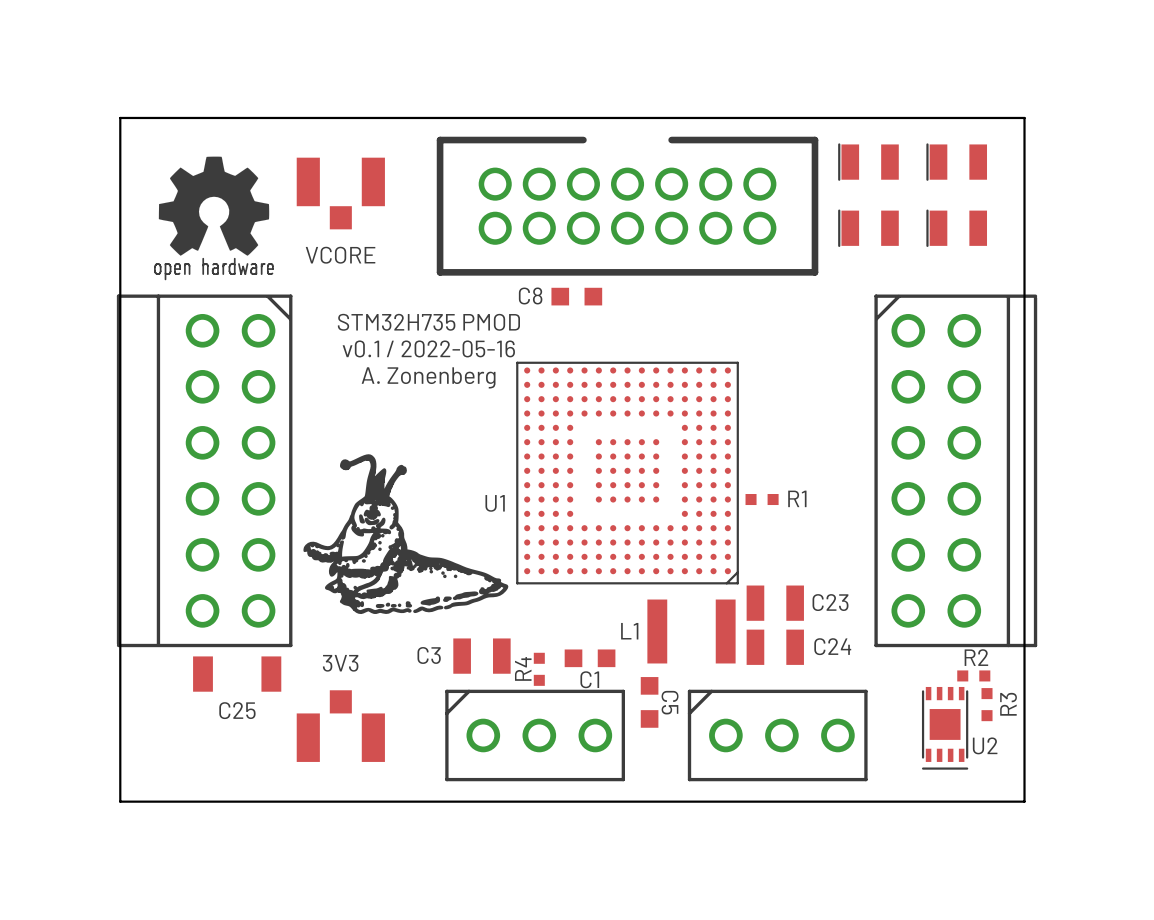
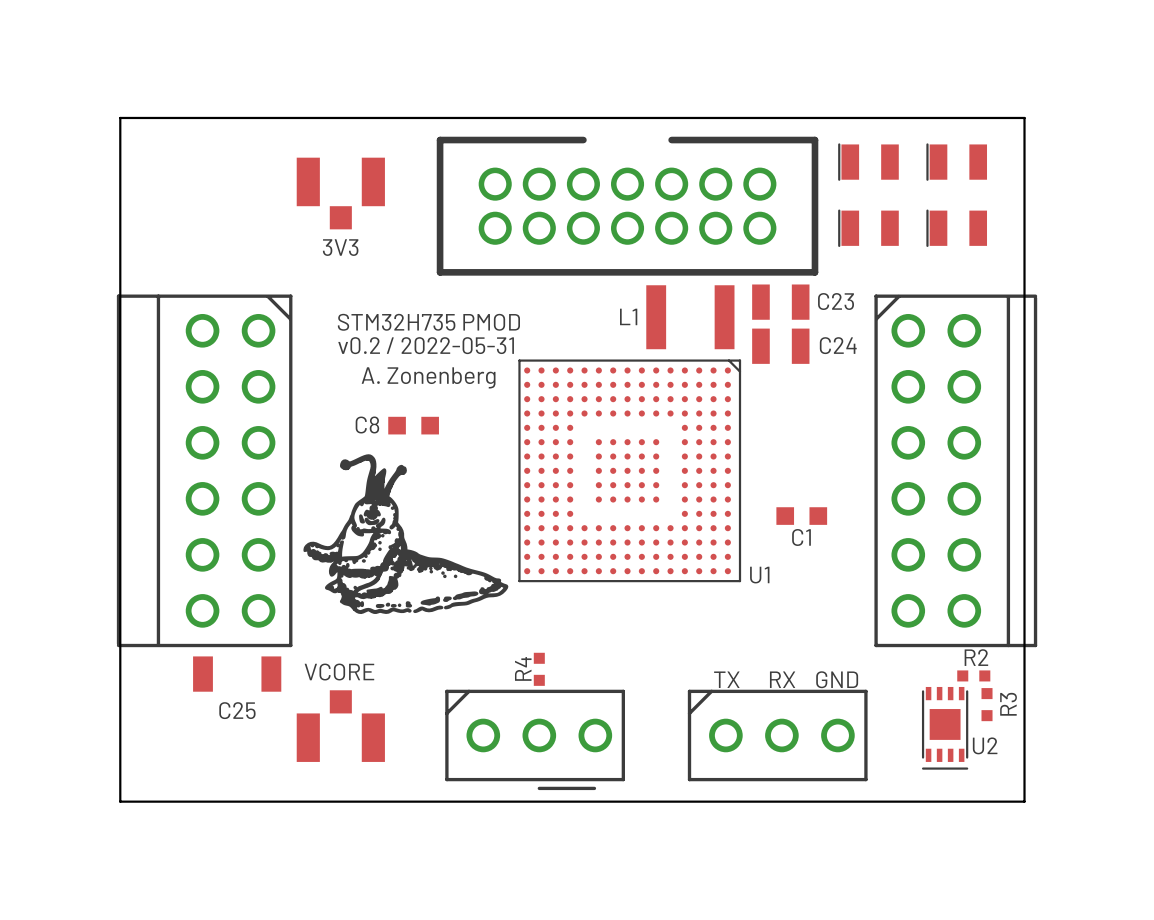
drawing: [154, 156, 274, 281] -> none
text position: VCORE (340, 255) -> VCORE (339, 672)
C8 position: (576, 296) -> (413, 425)
text: v0.1 / 2022-05-16 (428, 348) -> v0.2 / 2022-05-31 (426, 345)
U1 rotation: 0° (627, 473) -> 90° counterclockwise (629, 470)
R1: (762, 499) -> none
U1 name position: U1 (495, 503) -> U1 (759, 575)
C23 position: (775, 603) -> (780, 302)
L1 position: (691, 631) -> (690, 317)
C24 position: (775, 647) -> (780, 346)
C3: (481, 656) -> none
C1 position: (590, 658) -> (801, 516)
text position: 3V3 (340, 663) -> 3V3 (340, 247)
text: none -> TX (726, 679)
text: none -> RX (782, 679)
text: none -> GND (837, 679)
C5: (649, 702) -> none
line: none -> (539, 788) (594, 788)

